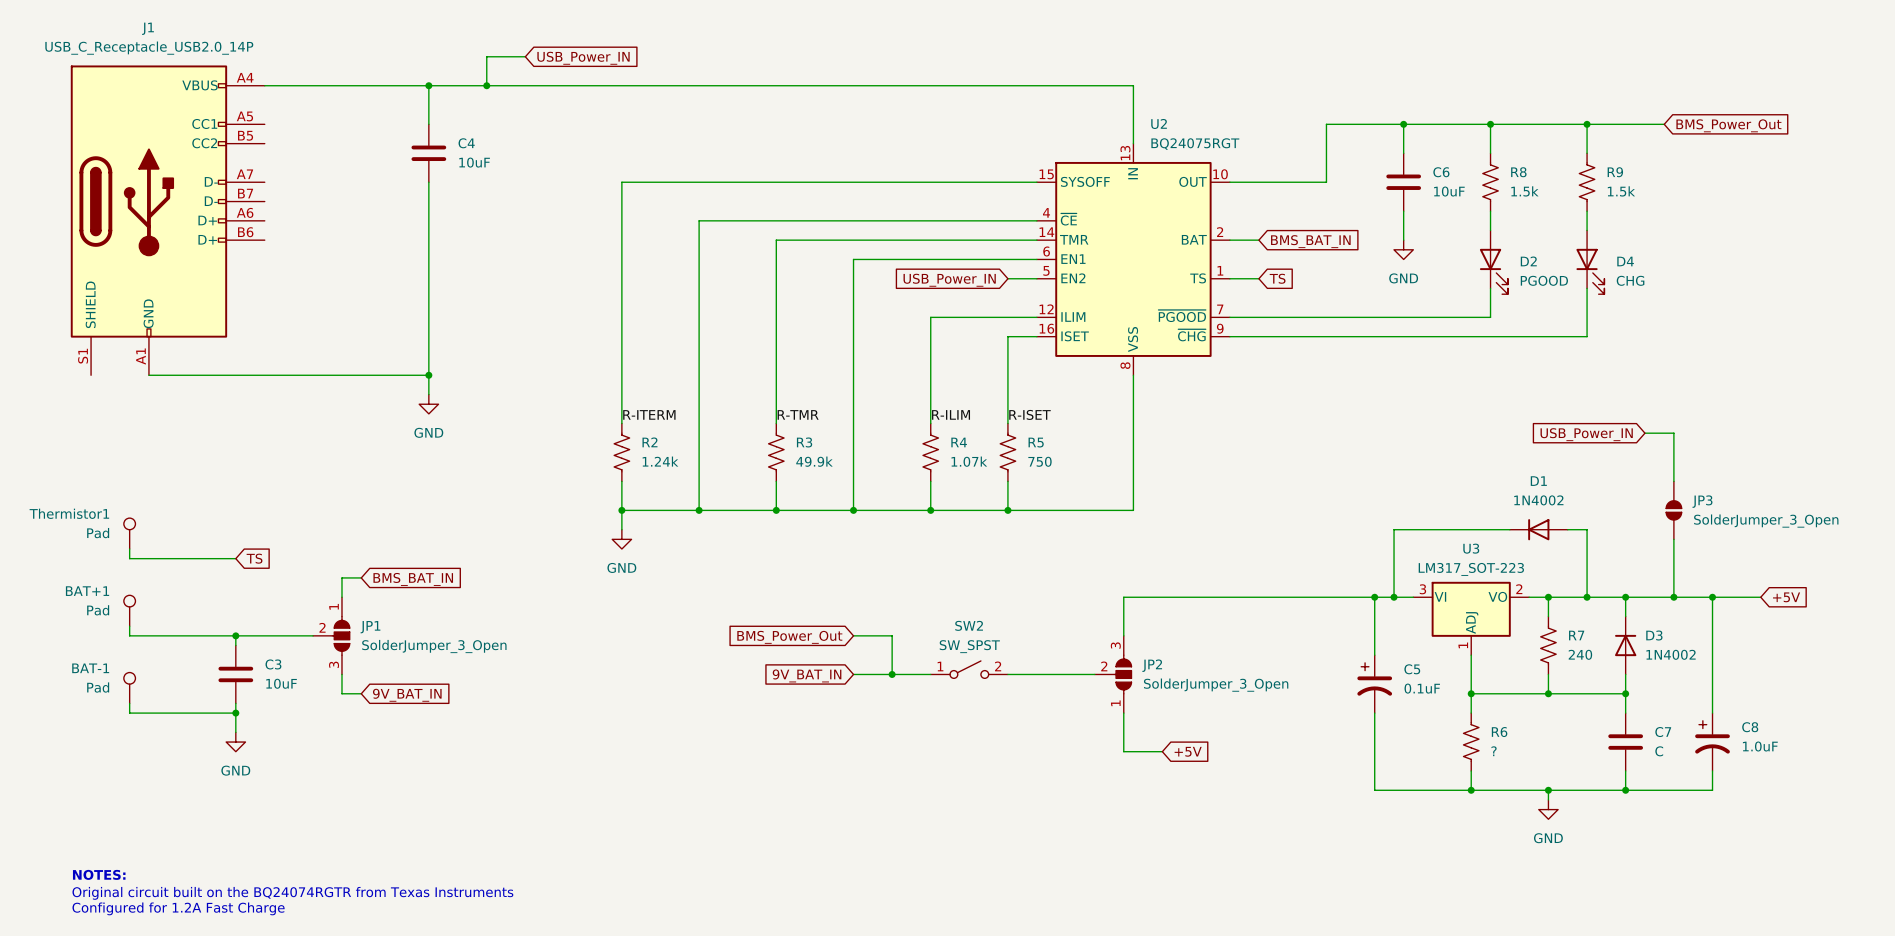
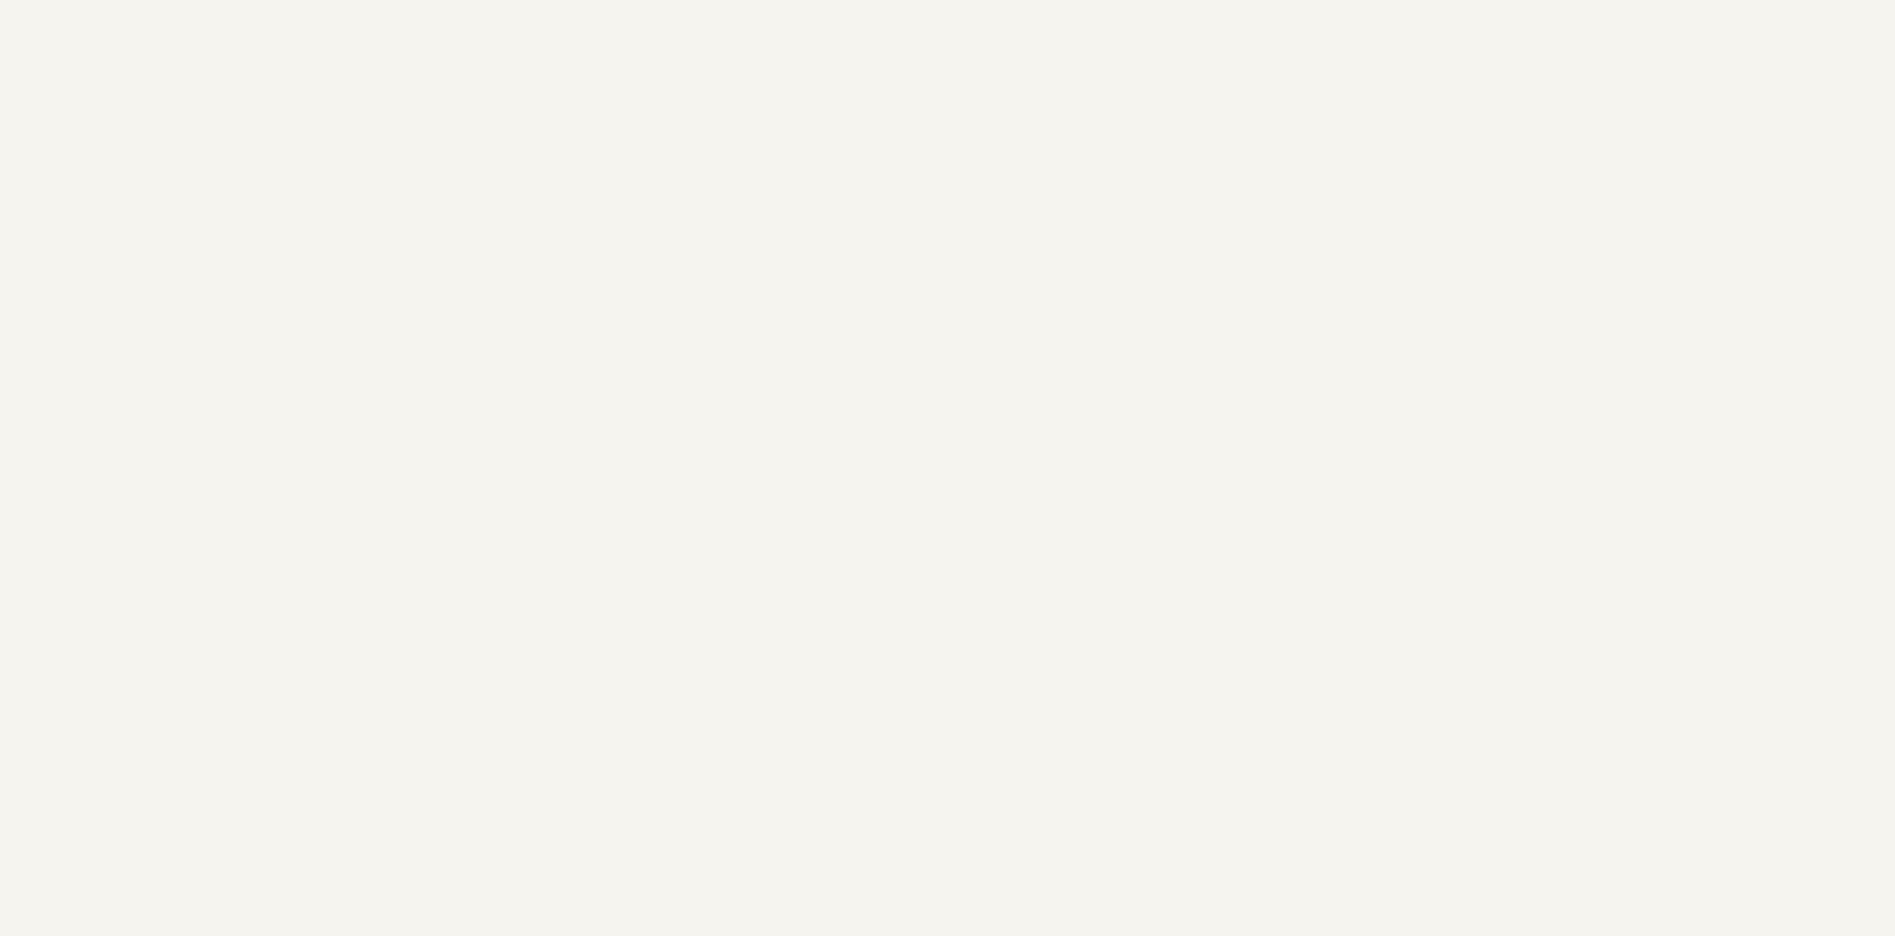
wire: (525, 56) (486, 56) (486, 85) -> none
global label: USB_Power_IN (583, 58) -> none
wire: (264, 85) (1133, 85) (1133, 143) -> none
wire: (428, 85) (428, 124) -> none
junction: (428, 85) -> none
junction: (486, 85) -> none
wire: (1403, 124) (1403, 153) -> none
junction: (1403, 124) -> none
wire: (1490, 124) (1490, 153) -> none
junction: (1490, 124) -> none
wire: (1587, 124) (1587, 153) -> none
junction: (1587, 124) -> none
wire: (1664, 124) (1326, 124) (1326, 182) (1229, 182) -> none
global label: BMS_Power_Out (1728, 125) -> none
C4: 10uF (428, 153) -> none
wire: (428, 182) (428, 394) -> none
wire: (1036, 182) (621, 182) (621, 423) -> none
C6: 10uF (1403, 182) -> none
R8: 1.5k (1490, 182) -> none
R9: 1.5k (1587, 182) -> none
wire: (1403, 211) (1403, 240) -> none
wire: (1490, 211) (1490, 230) -> none
wire: (1587, 211) (1587, 230) -> none
J1: USB_C_Receptacle_USB2.0_14P (167, 220) -> none
wire: (1036, 220) (699, 220) (699, 510) -> none
wire: (1036, 240) (776, 240) (776, 423) -> none
wire: (1229, 240) (1258, 240) -> none
global label: BMS_BAT_IN (1310, 241) -> none
power symbol: GND (1403, 249) -> none
wire: (1036, 259) (853, 259) (853, 510) -> none
U2: BQ24075RGT (1133, 259) -> none
D2: PGOOD (1493, 262) -> none
D4: CHG (1590, 262) -> none
wire: (1007, 278) (1036, 278) -> none
wire: (1229, 278) (1258, 278) -> none
global label: TS (1277, 278) -> none
global label: USB_Power_IN (949, 280) -> none
wire: (1490, 288) (1490, 317) (1229, 317) -> none
wire: (1587, 288) (1587, 336) (1229, 336) -> none
wire: (1036, 317) (930, 317) (930, 423) -> none
wire: (1036, 336) (1007, 336) (1007, 423) -> none
wire: (148, 375) (428, 375) -> none
junction: (428, 375) -> none
wire: (1133, 375) (1133, 510) (621, 510) -> none
power symbol: GND (428, 404) -> none
label: R-ITERM (649, 414) -> none
label: R-TMR (798, 414) -> none
label: R-ILIM (951, 414) -> none
label: R-ISET (1029, 414) -> none
wire: (1644, 433) (1673, 433) (1673, 481) -> none
global label: USB_Power_IN (1586, 434) -> none
R2: 1.24k (621, 452) -> none
R3: 49.9k (776, 452) -> none
R4: 1.07k (930, 452) -> none
R5: 750 (1007, 452) -> none
wire: (621, 481) (621, 529) -> none
wire: (776, 481) (776, 510) -> none
wire: (930, 481) (930, 510) -> none
wire: (1007, 481) (1007, 510) -> none
junction: (621, 510) -> none
junction: (699, 510) -> none
junction: (776, 510) -> none
junction: (853, 510) -> none
junction: (930, 510) -> none
junction: (1007, 510) -> none
JP3: SolderJumper_3_Open (1673, 510) -> none
wire: (1509, 529) (1394, 529) (1394, 597) -> none
D1: 1N4002 (1538, 529) -> none
wire: (1567, 529) (1587, 529) (1587, 597) -> none
Thermistor1: Pad (129, 533) -> none
power symbol: GND (621, 539) -> none
wire: (1673, 539) (1673, 597) -> none
wire: (129, 549) (129, 558) (235, 558) -> none
global label: TS (254, 558) -> none
wire: (361, 577) (341, 577) (341, 597) -> none
global label: BMS_BAT_IN (413, 579) -> none
wire: (1374, 597) (1374, 655) -> none
junction: (1374, 597) -> none
junction: (1394, 597) -> none
wire: (1413, 597) (1123, 597) (1123, 635) -> none
wire: (1529, 597) (1760, 597) -> none
wire: (1548, 597) (1548, 616) -> none
junction: (1548, 597) -> none
junction: (1587, 597) -> none
wire: (1625, 597) (1625, 616) -> none
junction: (1625, 597) -> none
junction: (1673, 597) -> none
wire: (1712, 597) (1712, 713) -> none
junction: (1712, 597) -> none
global label: +5V (1786, 597) -> none
BAT+1: Pad (129, 610) -> none
U3: LM317_SOT-223 (1471, 618) -> none
wire: (129, 626) (129, 635) (313, 635) -> none
wire: (235, 635) (235, 645) -> none
junction: (235, 635) -> none
JP1: SolderJumper_3_Open (331, 635) -> none
wire: (853, 635) (892, 635) (892, 674) -> none
global label: BMS_Power_Out (789, 637) -> none
R7: 240 (1548, 645) -> none
D3: 1N4002 (1625, 645) -> none
wire: (1471, 655) (1471, 713) -> none
SW2: SW_SPST (969, 669) -> none
C3: 10uF (235, 674) -> none
wire: (341, 674) (341, 693) (361, 693) -> none
wire: (853, 674) (930, 674) -> none
junction: (892, 674) -> none
wire: (1007, 674) (1094, 674) -> none
JP2: SolderJumper_3_Open (1113, 674) -> none
wire: (1548, 674) (1548, 693) -> none
wire: (1625, 674) (1625, 713) -> none
global label: 9V_BAT_IN (807, 675) -> none
C5: 0.1uF (1374, 684) -> none
BAT-1: Pad (129, 687) -> none
wire: (1471, 693) (1625, 693) -> none
junction: (1471, 693) -> none
junction: (1548, 693) -> none
junction: (1625, 693) -> none
global label: 9V_BAT_IN (407, 695) -> none
wire: (129, 703) (129, 713) (235, 713) -> none
wire: (235, 703) (235, 732) -> none
junction: (235, 713) -> none
wire: (1123, 713) (1123, 751) (1162, 751) -> none
wire: (1374, 713) (1374, 790) (1712, 790) (1712, 770) -> none
power symbol: GND (235, 742) -> none
R6: ? (1471, 742) -> none
C7: C (1625, 742) -> none
C8: 1.0uF (1712, 742) -> none
global label: +5V (1188, 751) -> none
wire: (1471, 770) (1471, 790) -> none
wire: (1625, 770) (1625, 790) -> none
junction: (1471, 790) -> none
wire: (1548, 790) (1548, 799) -> none
junction: (1548, 790) -> none
junction: (1625, 790) -> none
power symbol: GND (1548, 809) -> none
text: NOTES: (99, 874) -> none
text: Original circuit built on the BQ24074RGTR from Texas Instruments (292, 893) -> none
text: Configured for 1.2A Fast Charge (178, 908) -> none

